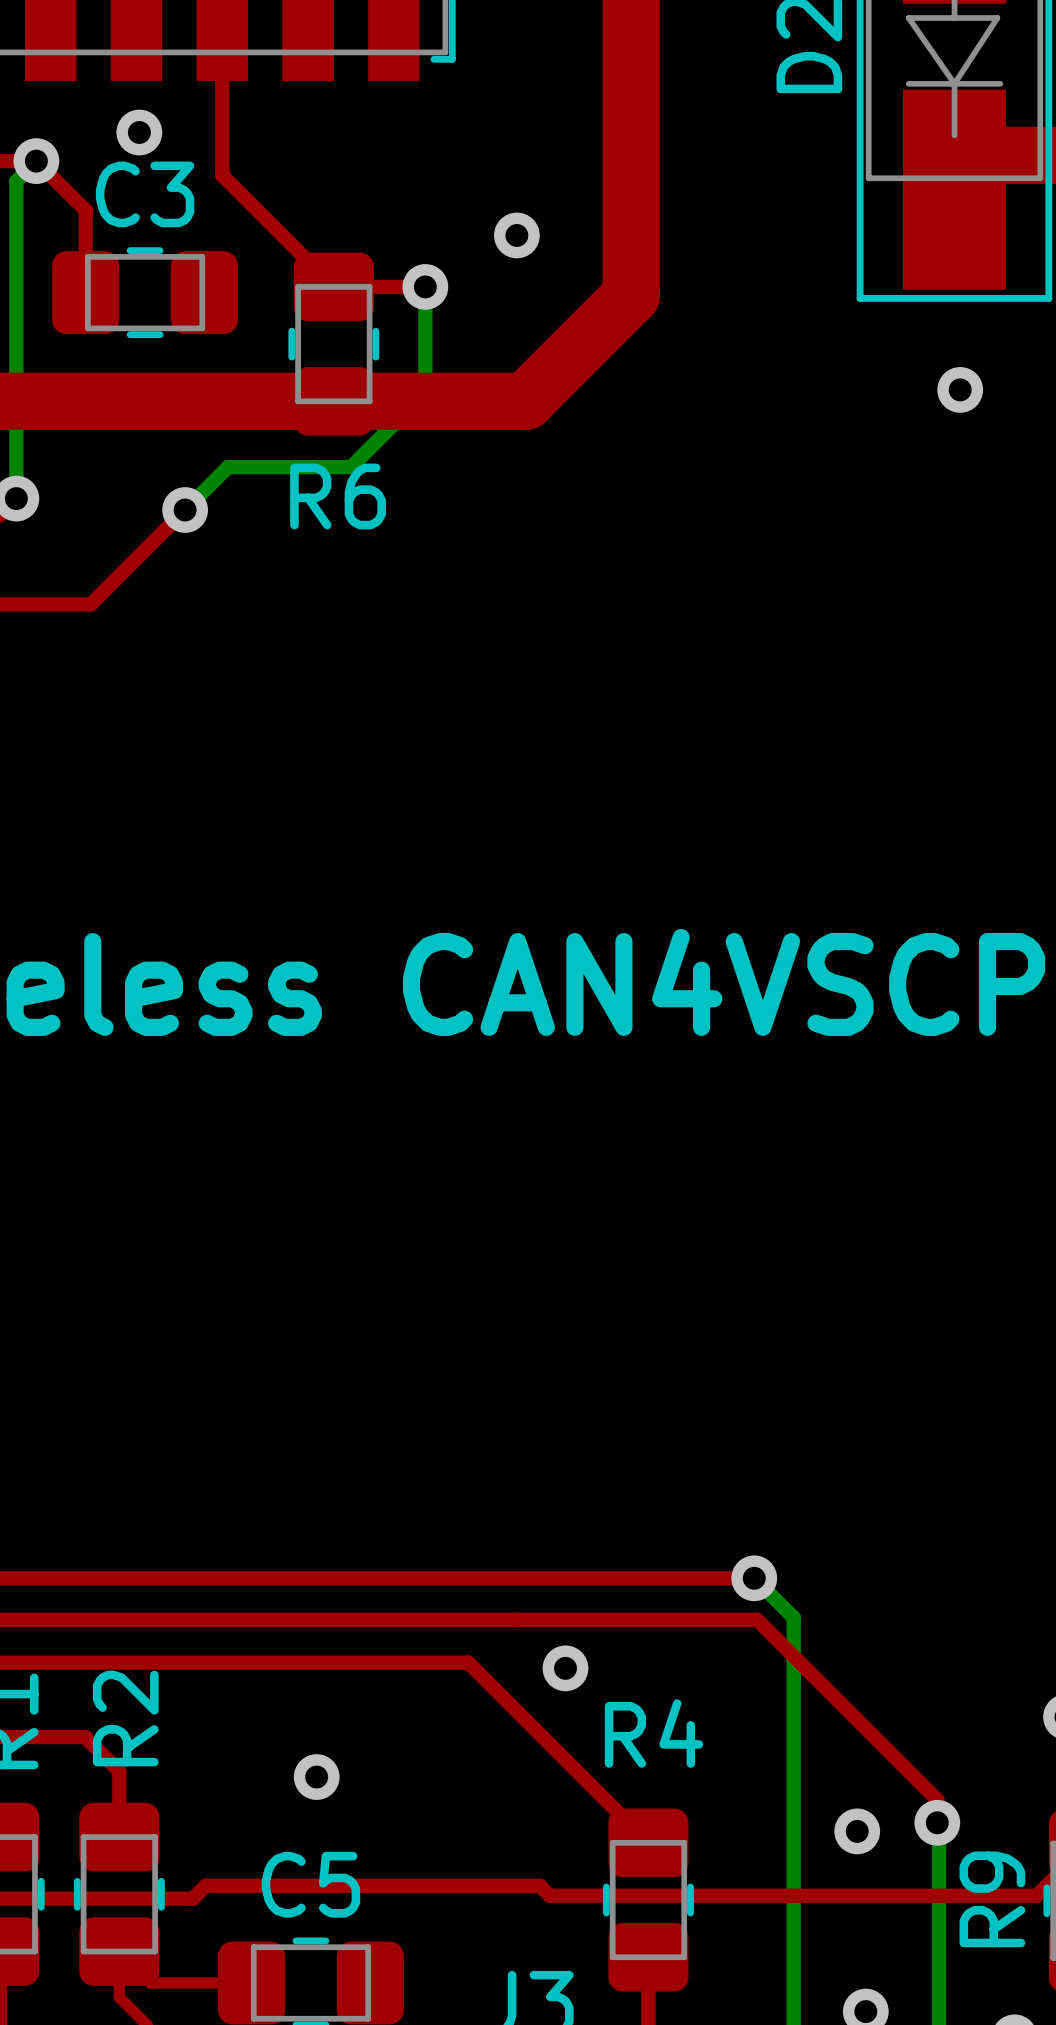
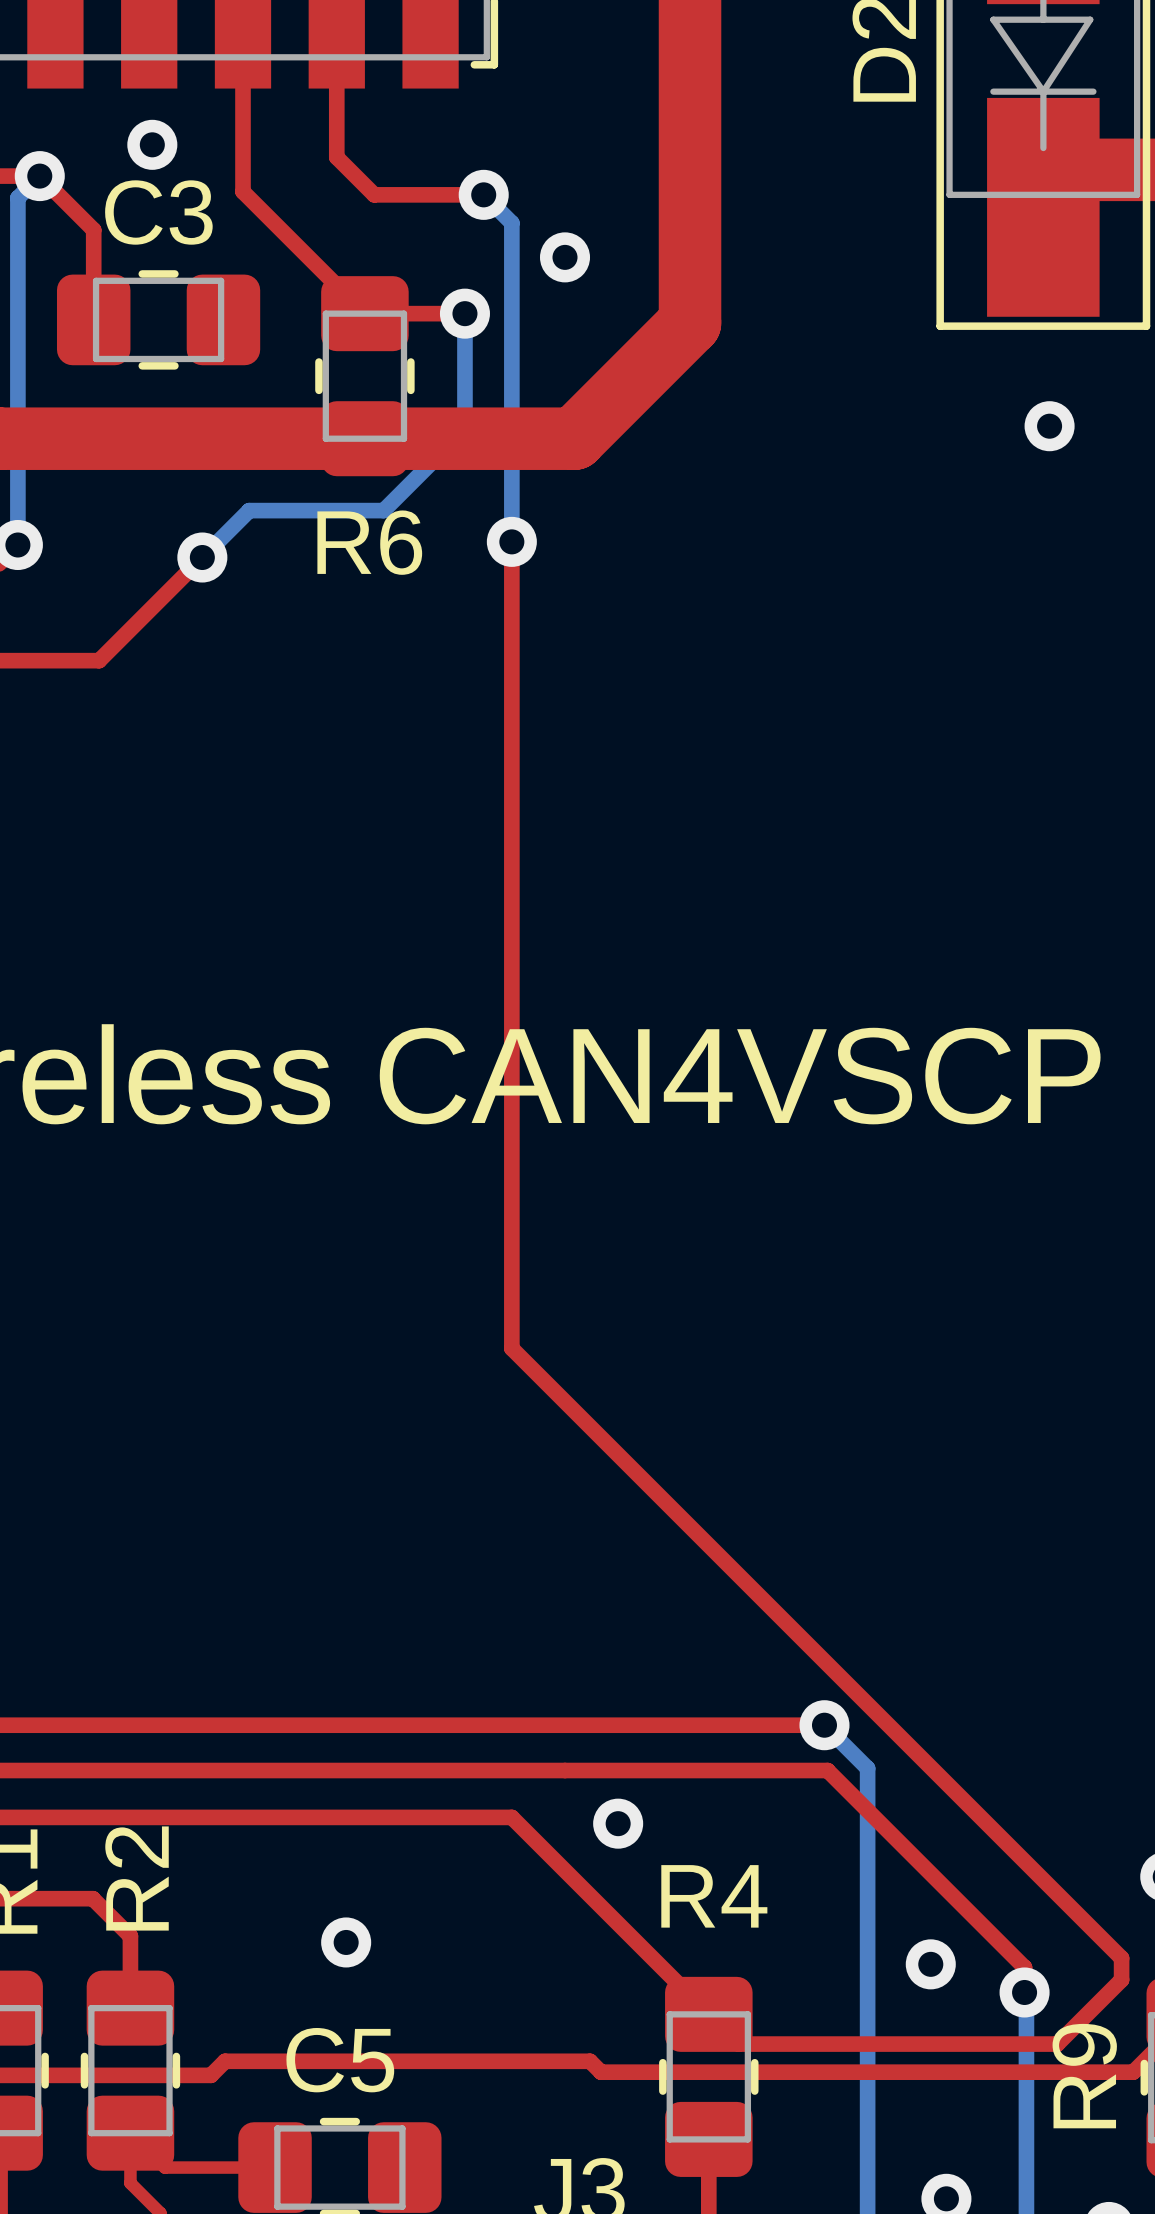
top track: none -> (336, 41) (336, 157) (374, 194) (483, 194)
bottom track: none -> (483, 194) (511, 222) (511, 541)
via: none -> (483, 194)
top track: none -> (511, 541) (511, 1348) (1121, 1958) (1121, 1979) (1057, 2044) (738, 2044) (728, 2034)
via: none -> (511, 541)
via position: (857, 1831) -> (930, 1964)

